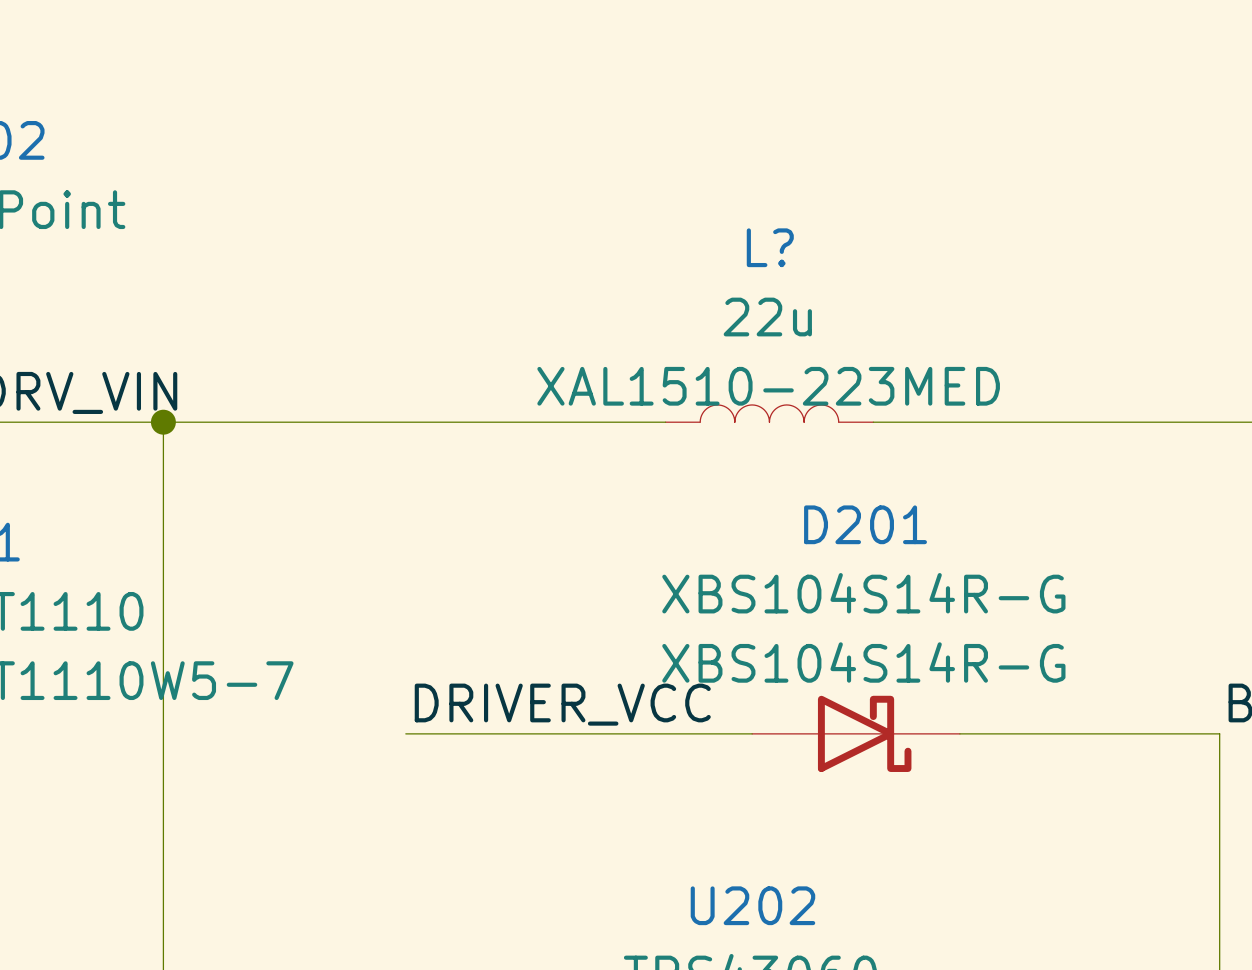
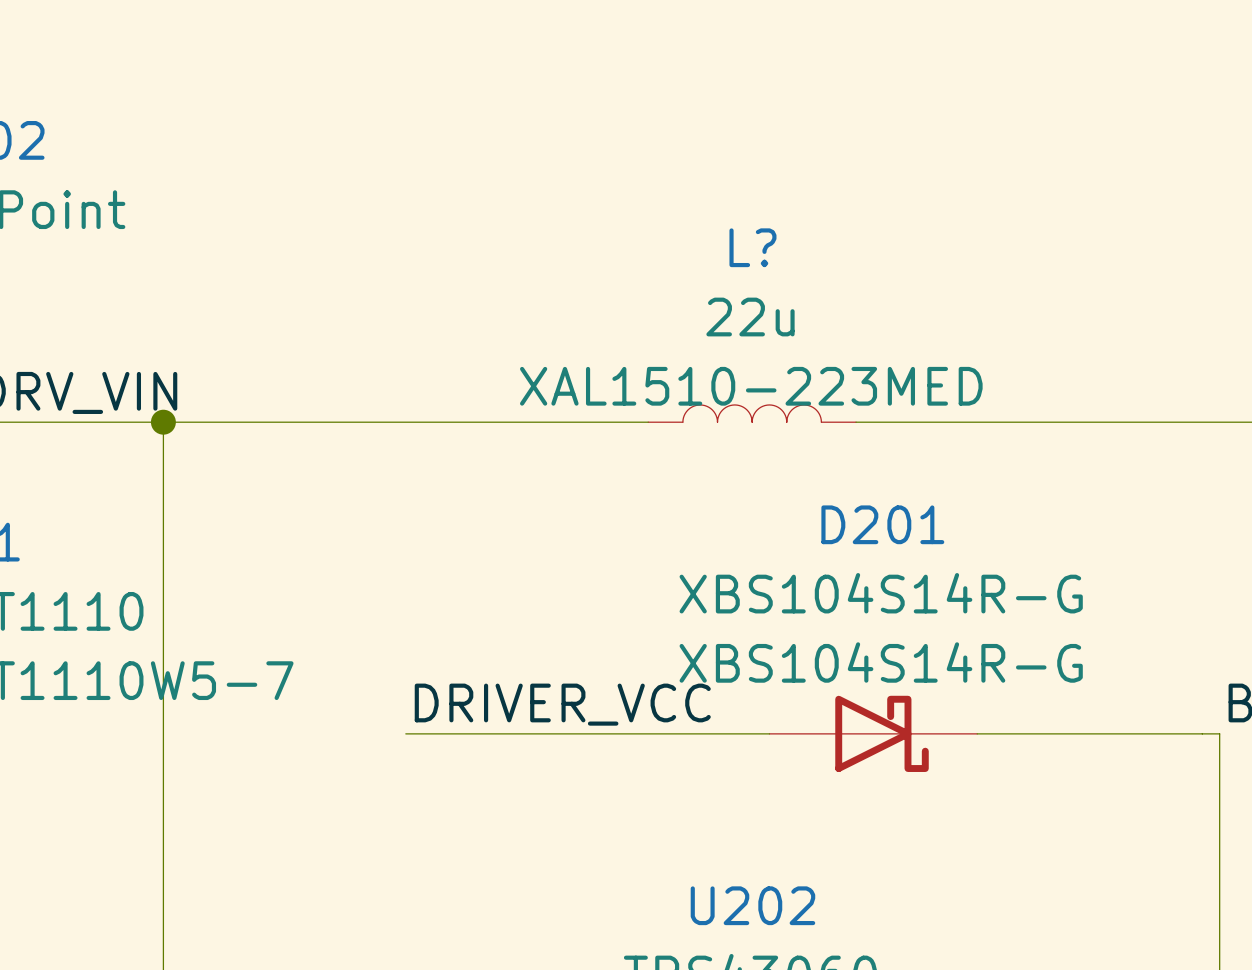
L? position: (769, 413) -> (752, 413)
D201 position: (856, 733) -> (873, 733)

